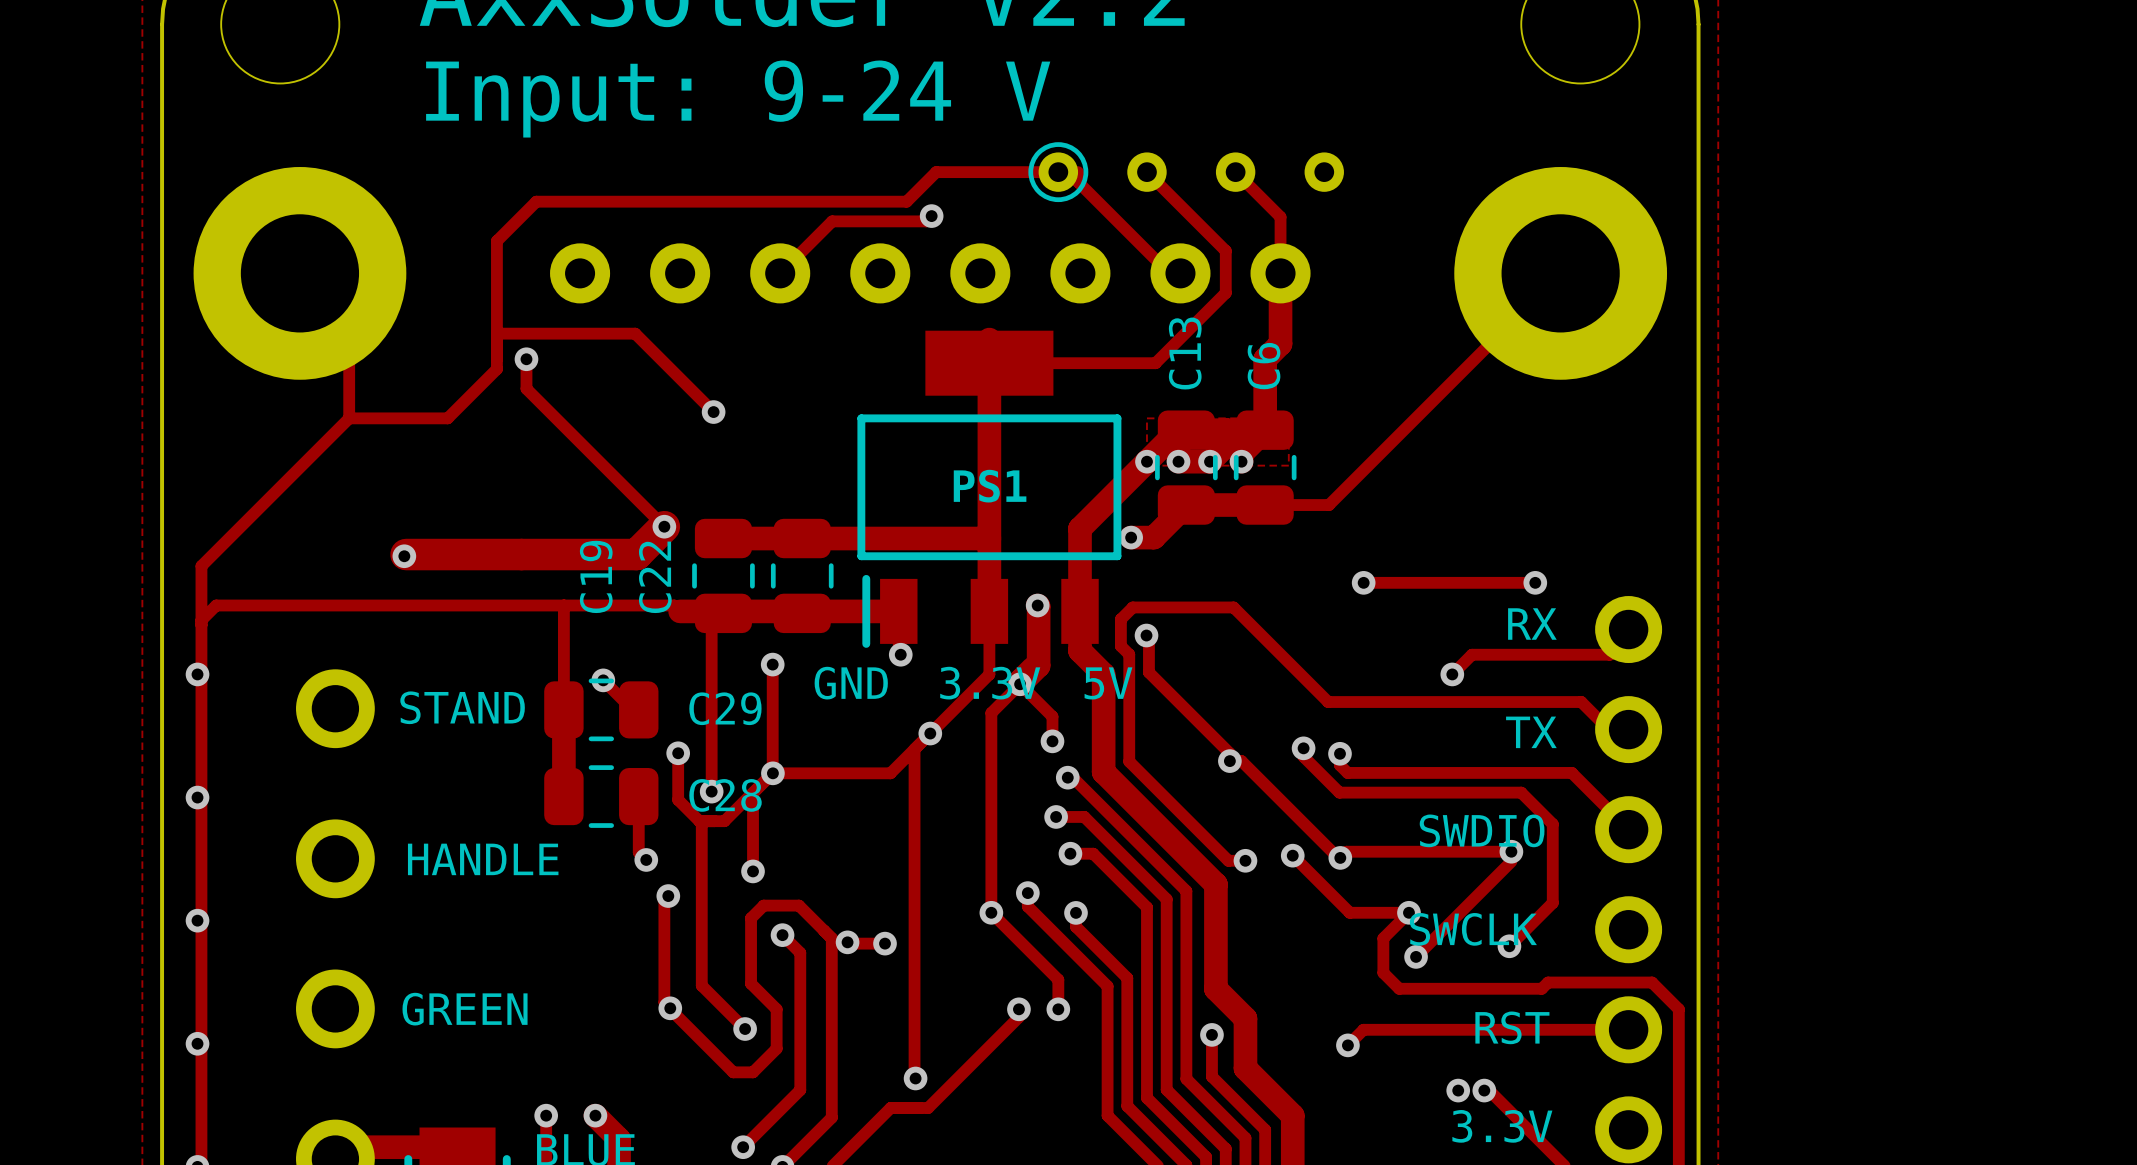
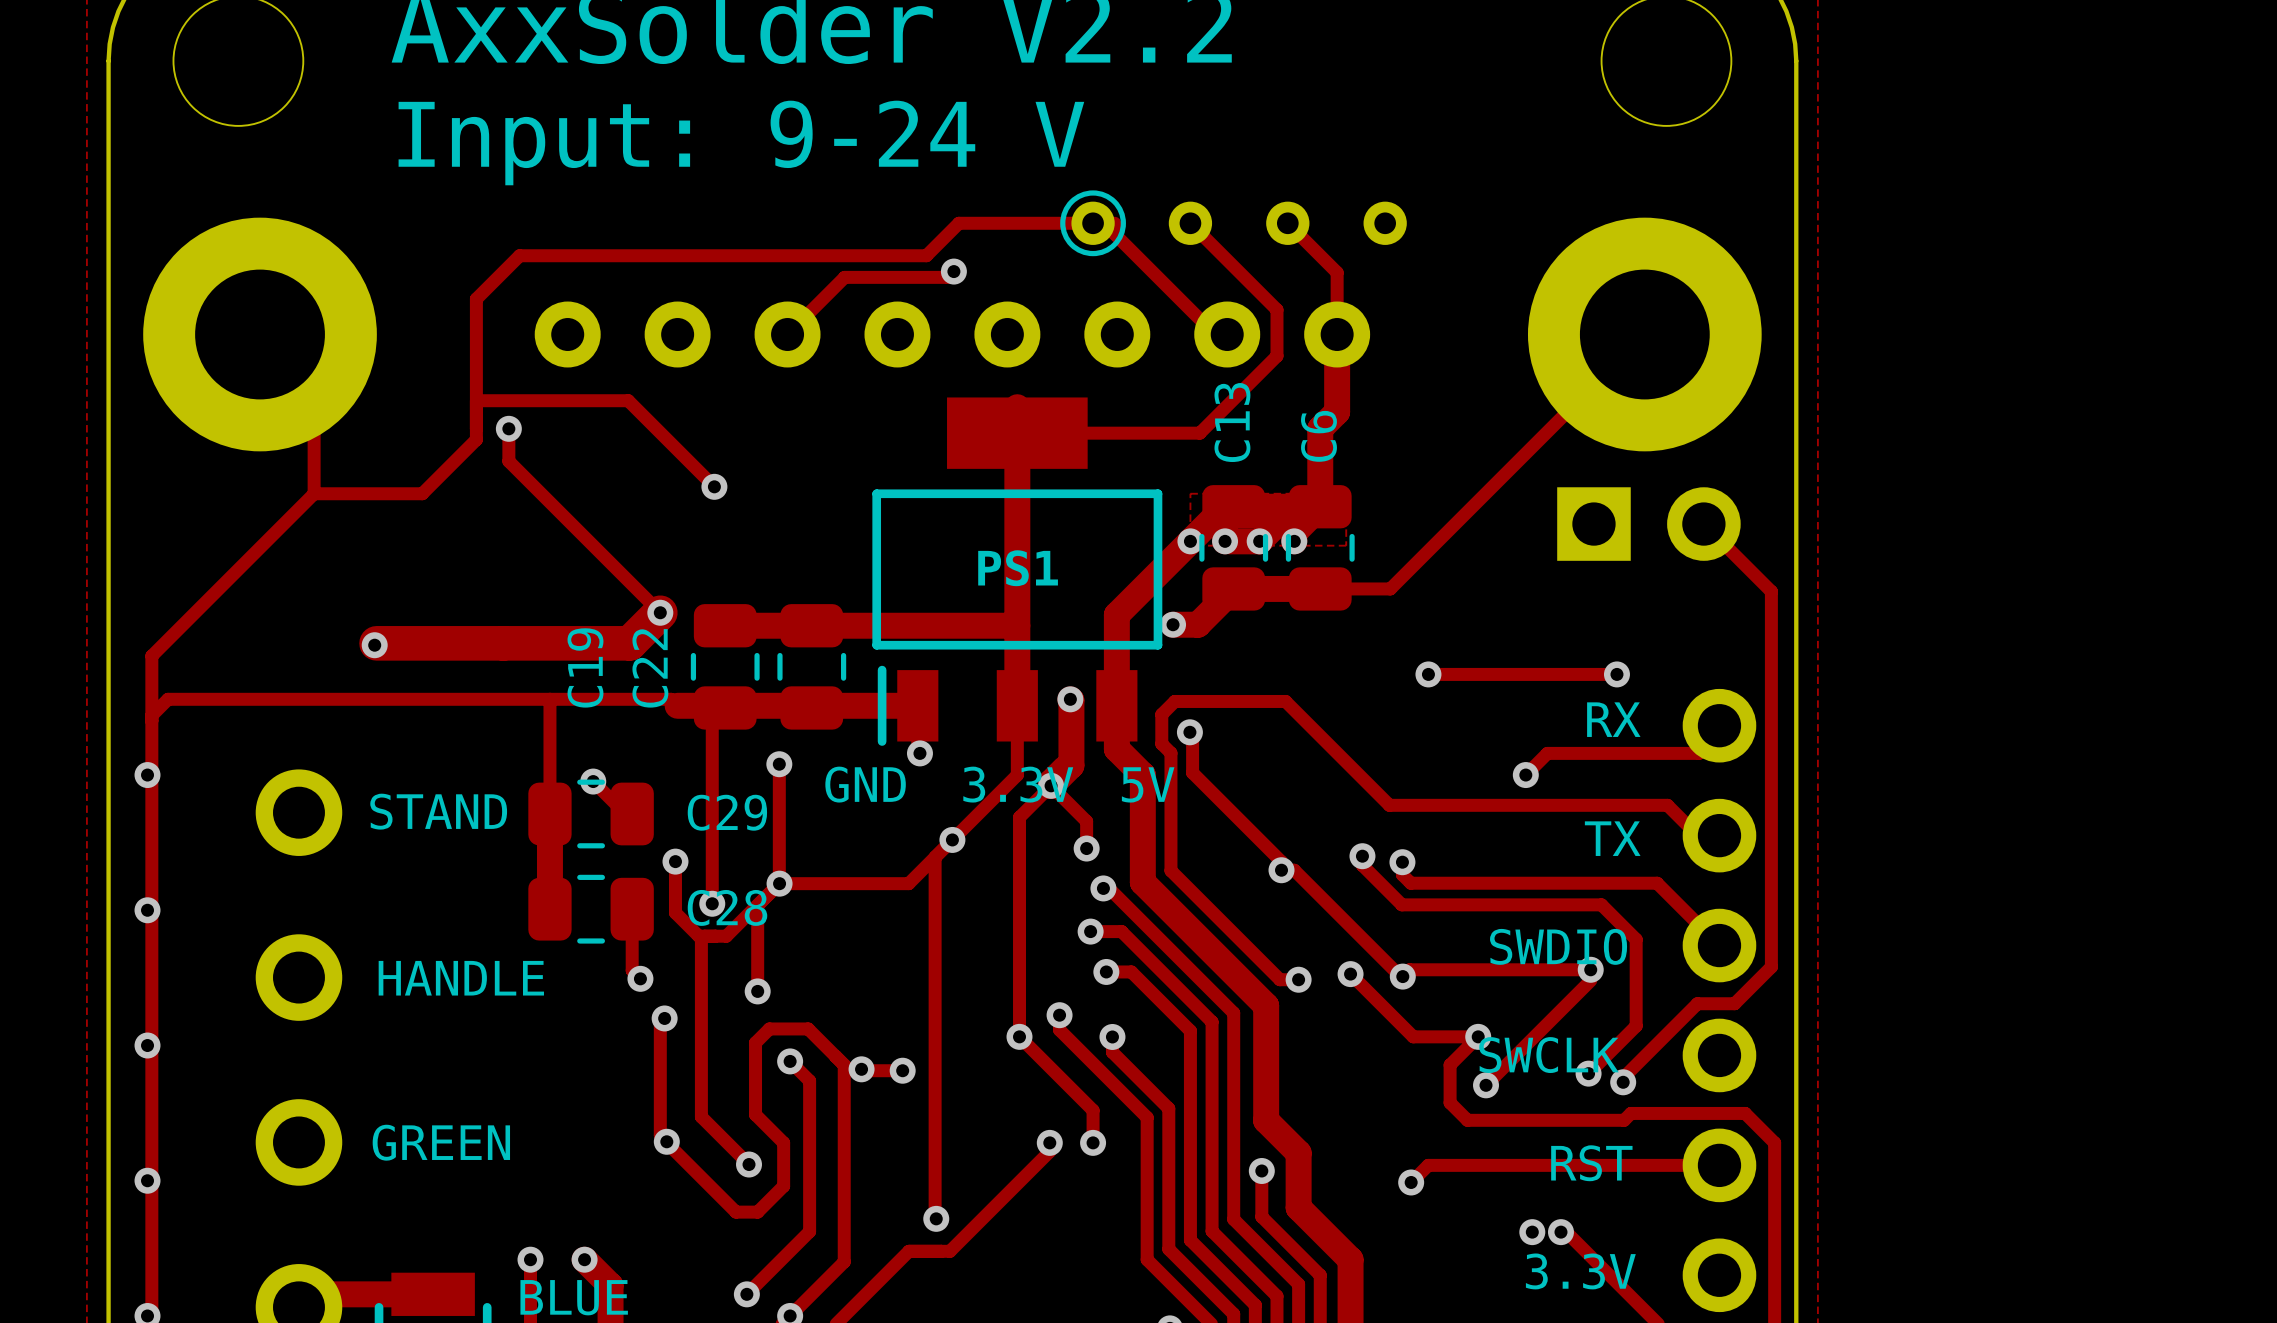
part: none -> (1648, 524)
track: none -> (1703, 524) (1771, 591) (1771, 966) (1734, 1003) (1697, 1003) (1623, 1077) (1623, 1082)
via: none -> (1623, 1082)

